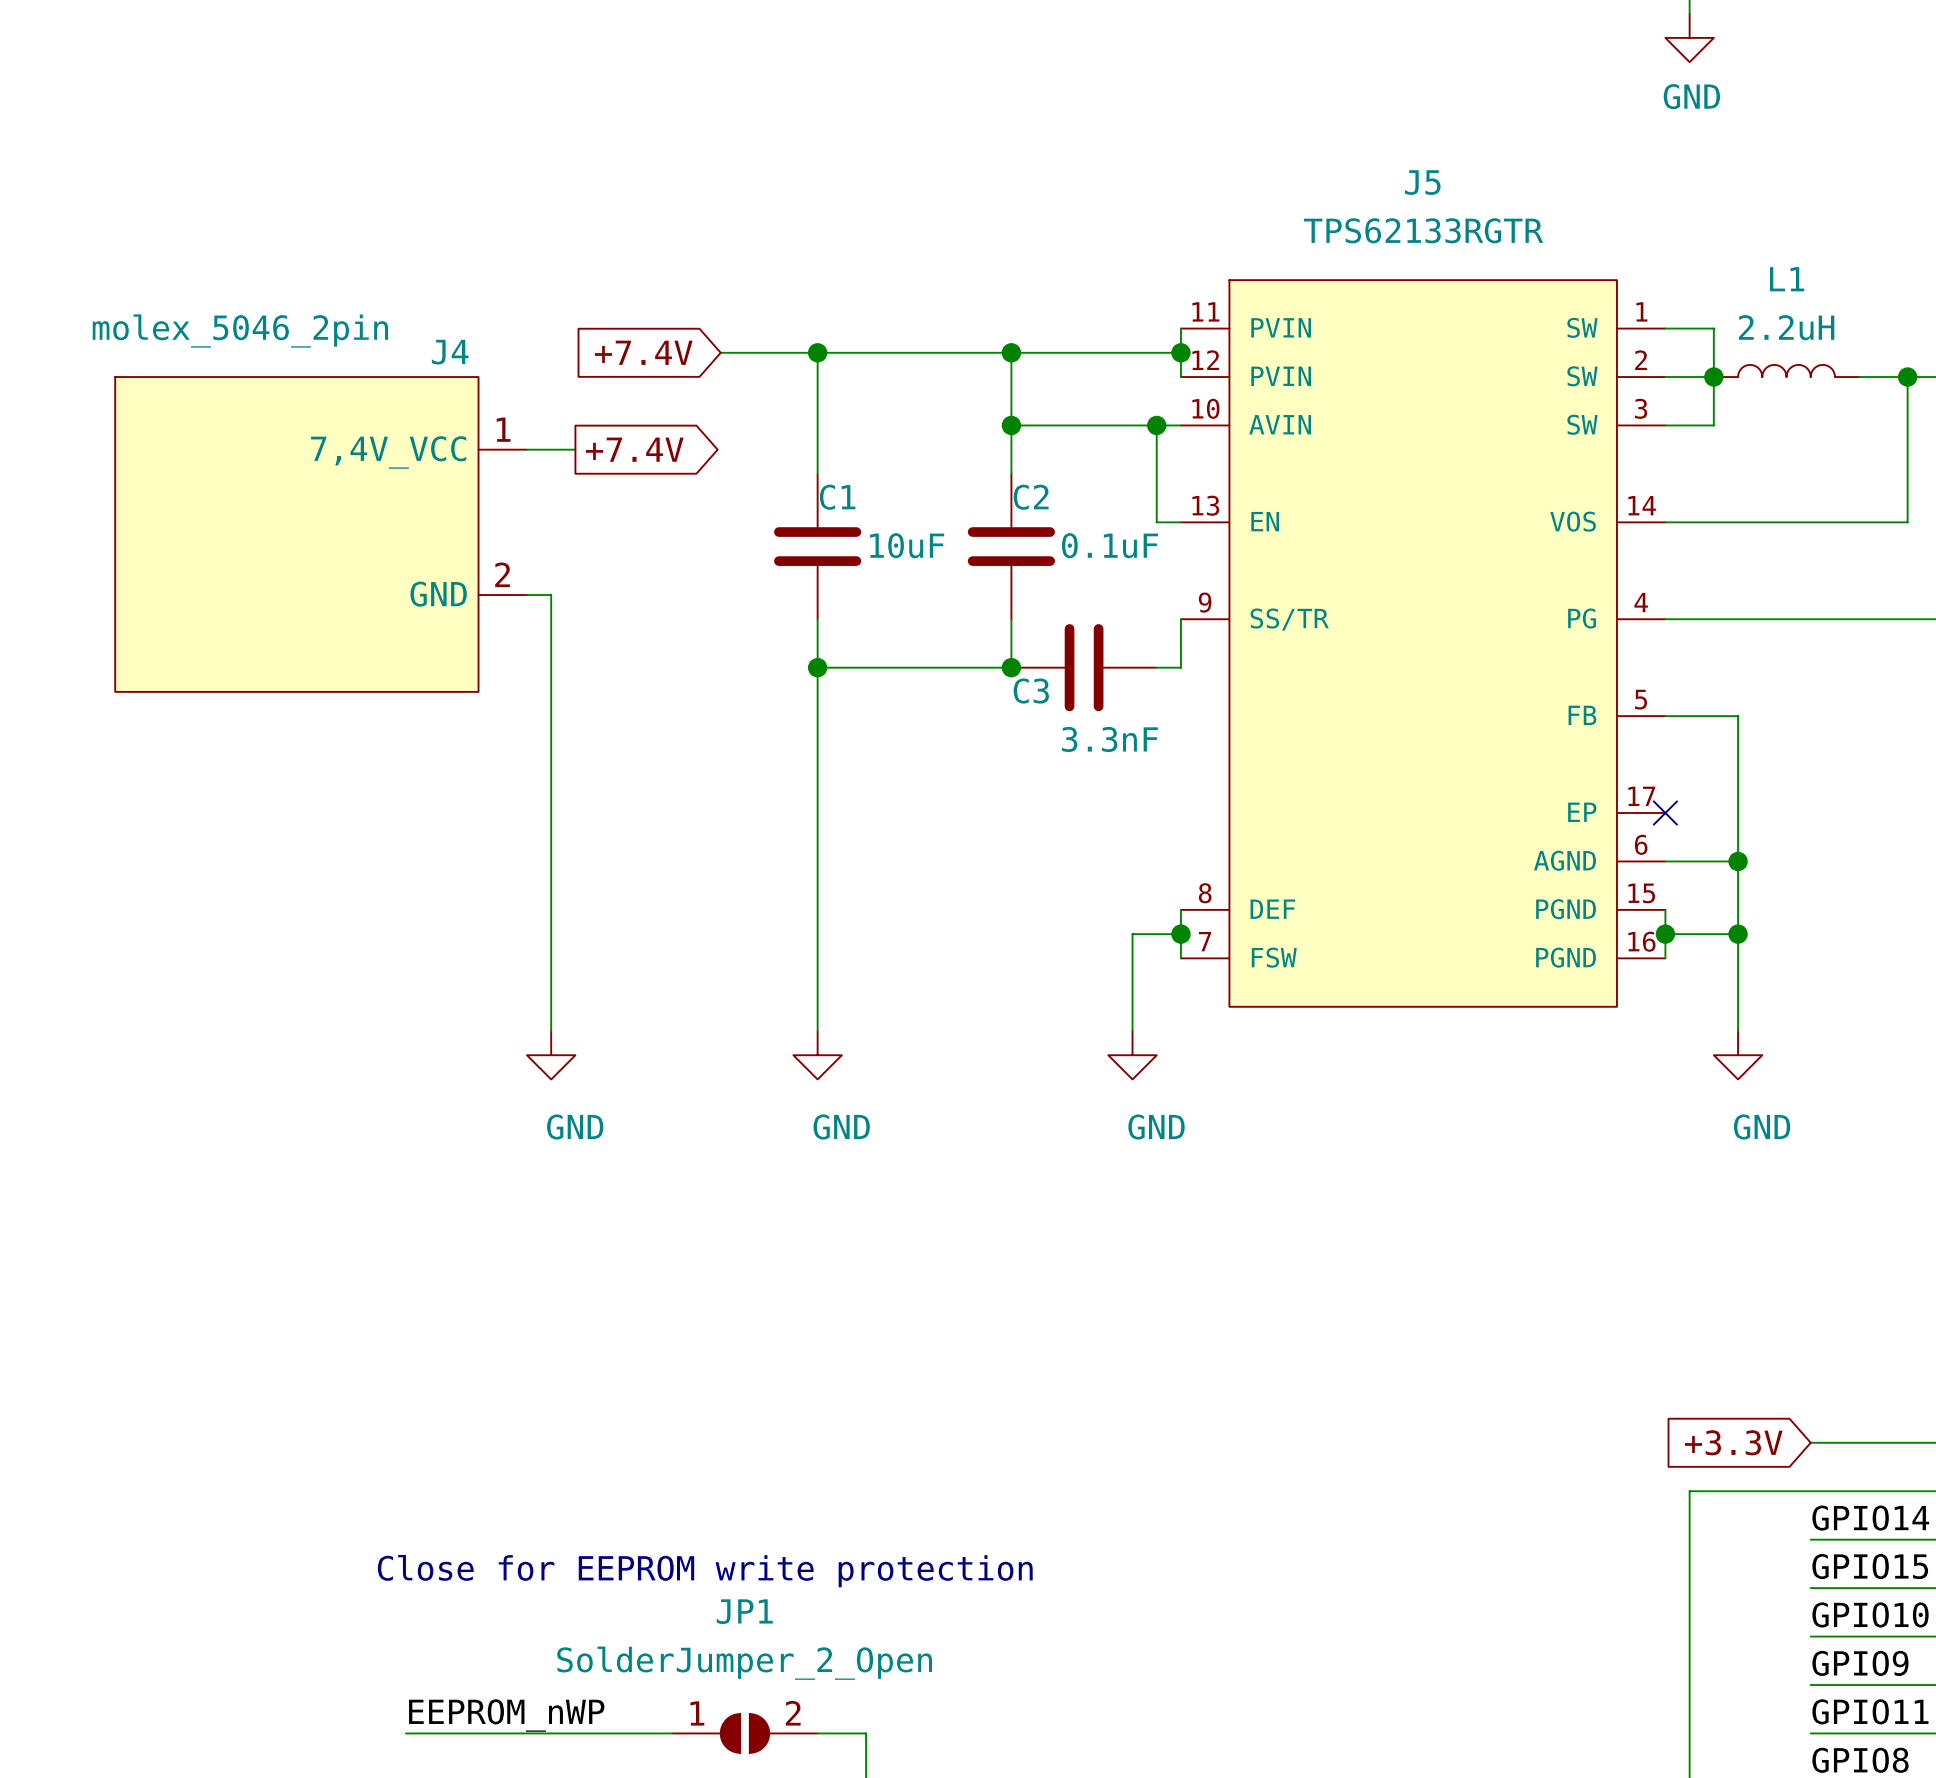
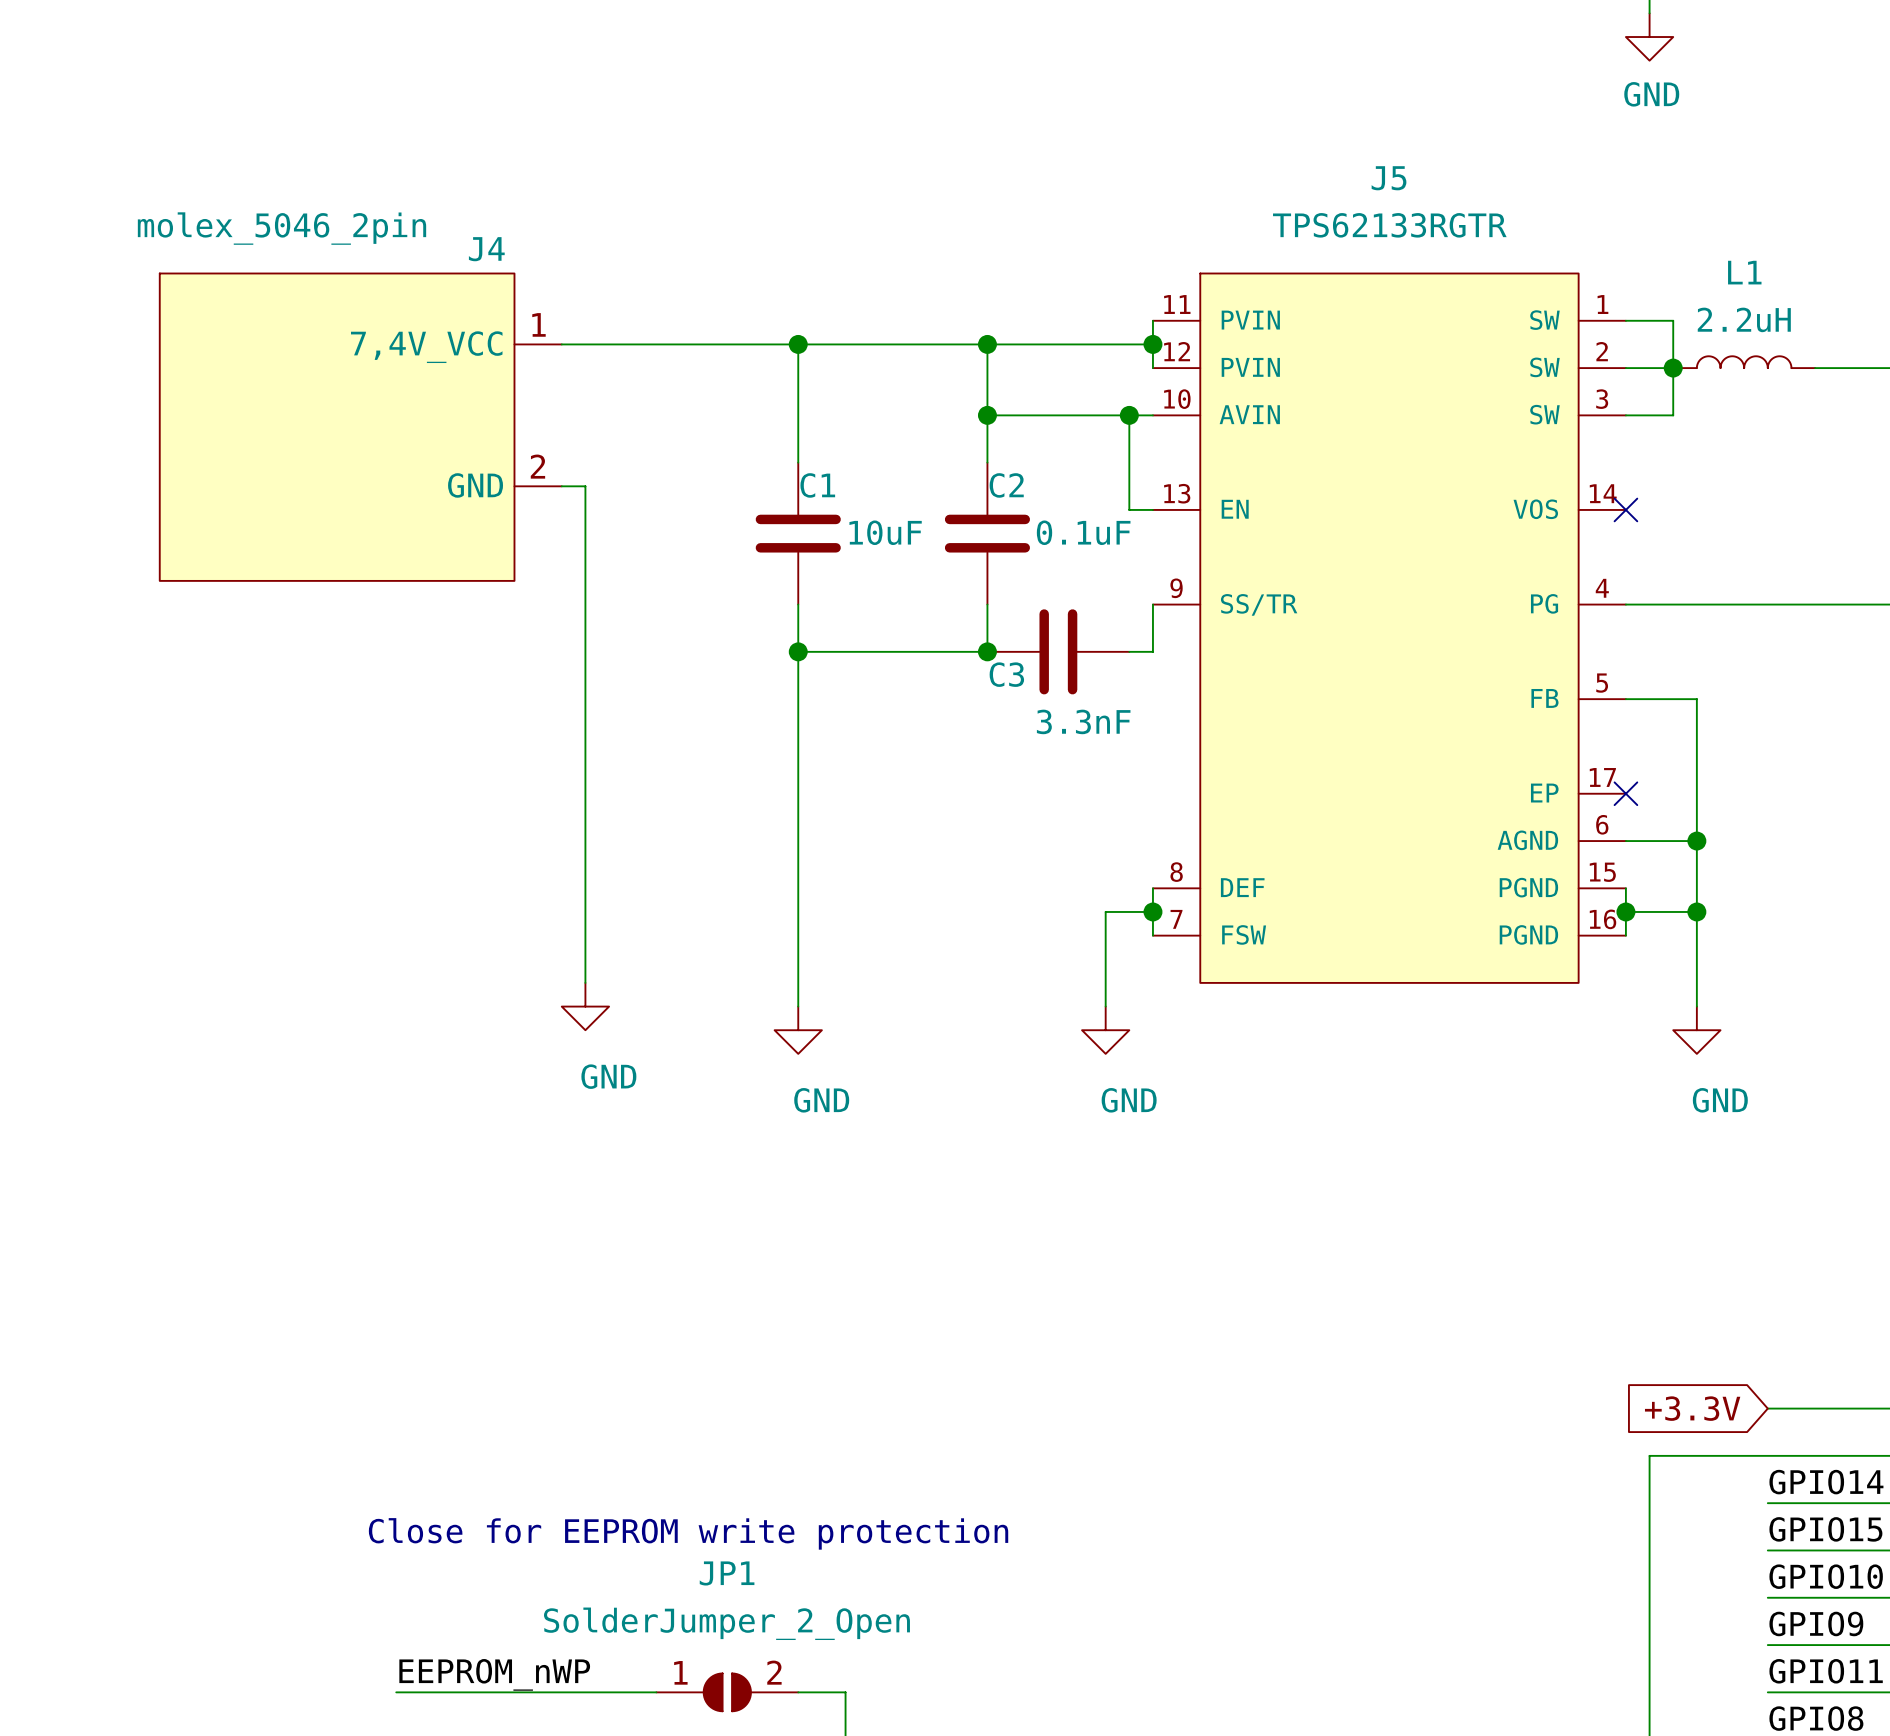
wire: none -> (561, 344) (703, 344)
global label: +7.4V (643, 352) -> none
wire: (1907, 377) (1907, 522) (1665, 522) -> none
junction: (1907, 377) -> none
wire: (526, 449) (575, 449) -> none
global label: +7.4V (634, 449) -> none
wire: none -> (561, 486) (585, 486) (585, 982)
no-connect mark: none -> (1625, 509)
J4 position: (321, 534) -> (360, 427)
wire: (526, 595) (551, 595) (551, 1031) -> none
power symbol position: GND (551, 1055) -> GND (585, 1006)

